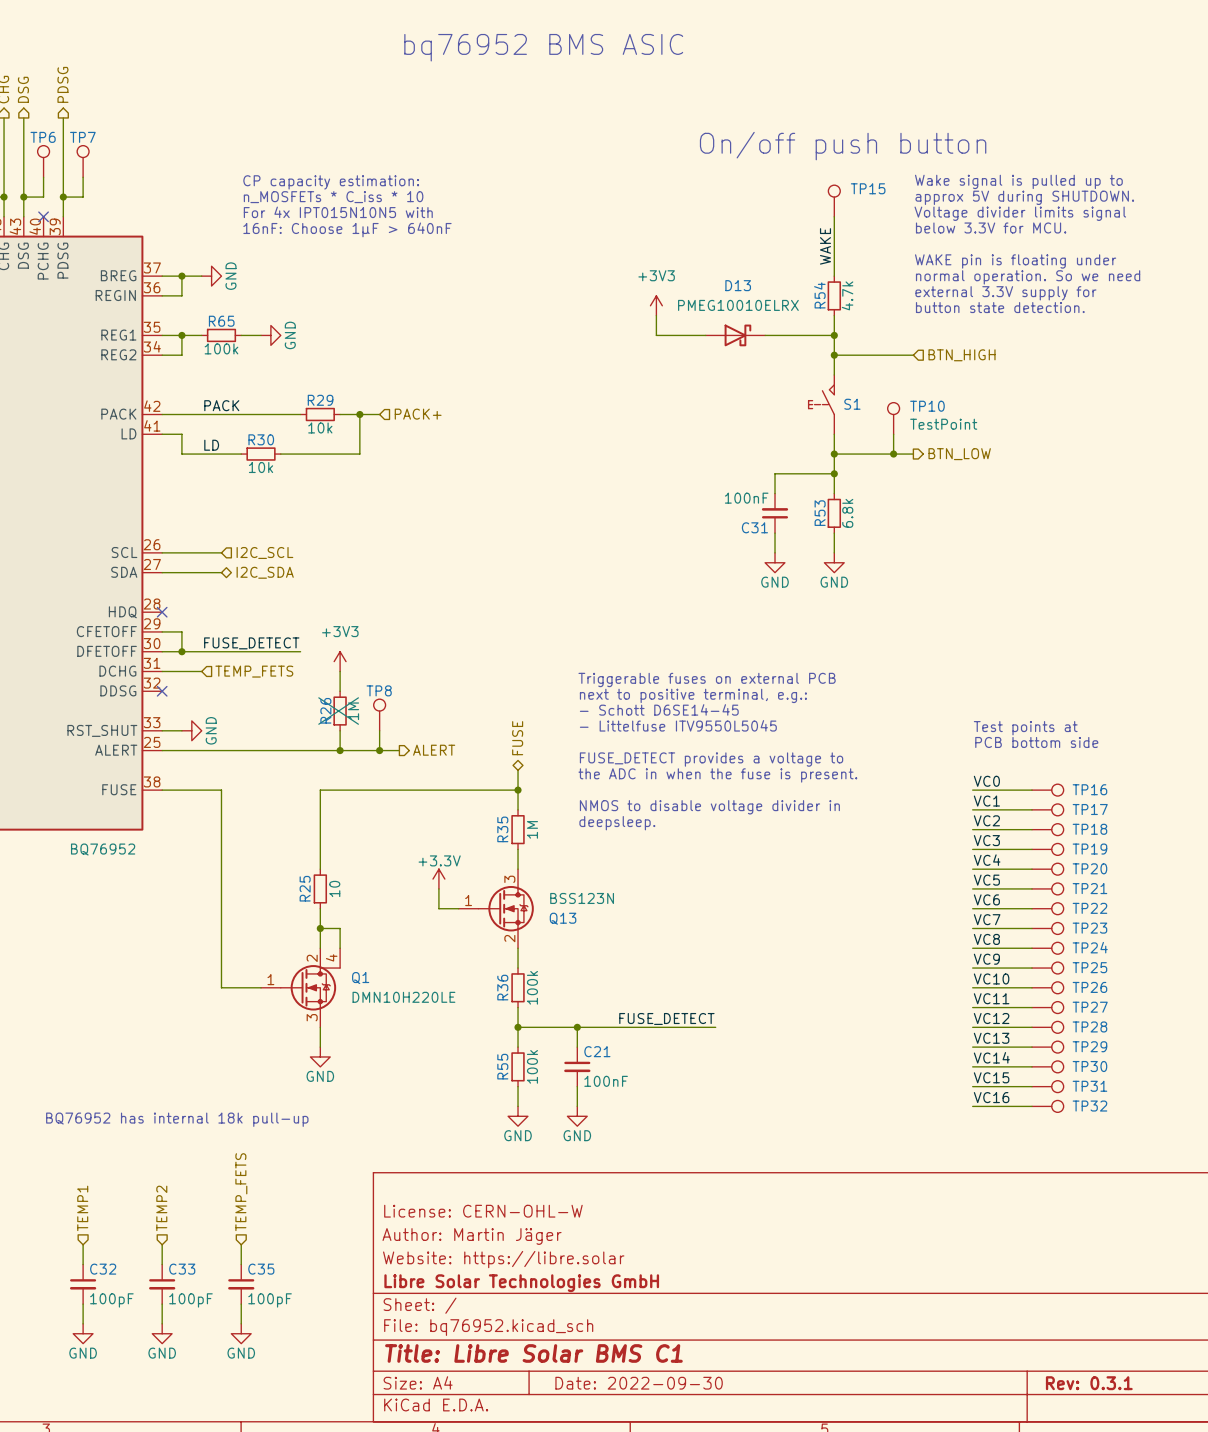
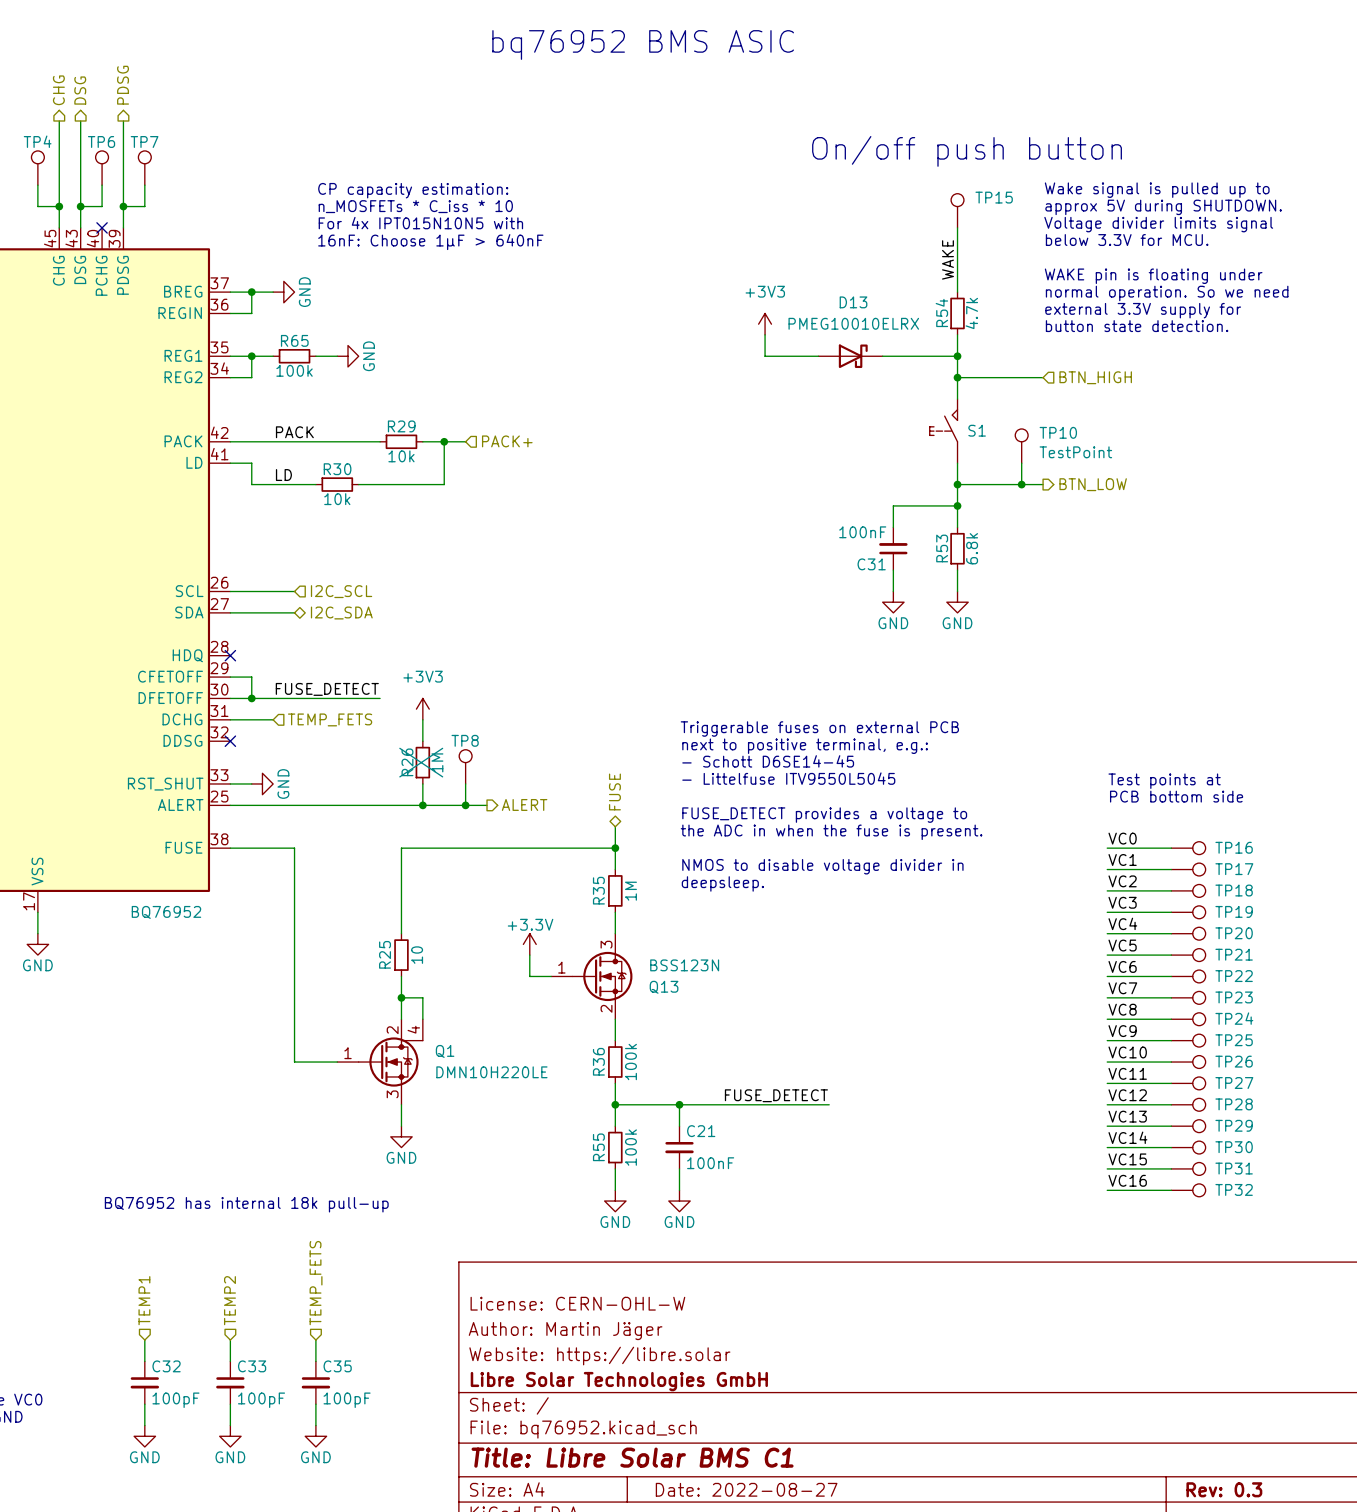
title block: Date: 2022-09-30 (639, 1383) -> Date: 2022-08-27 (746, 1489)
title block: Rev: 0.3.1 (1089, 1383) -> Rev: 0.3 (1224, 1489)

